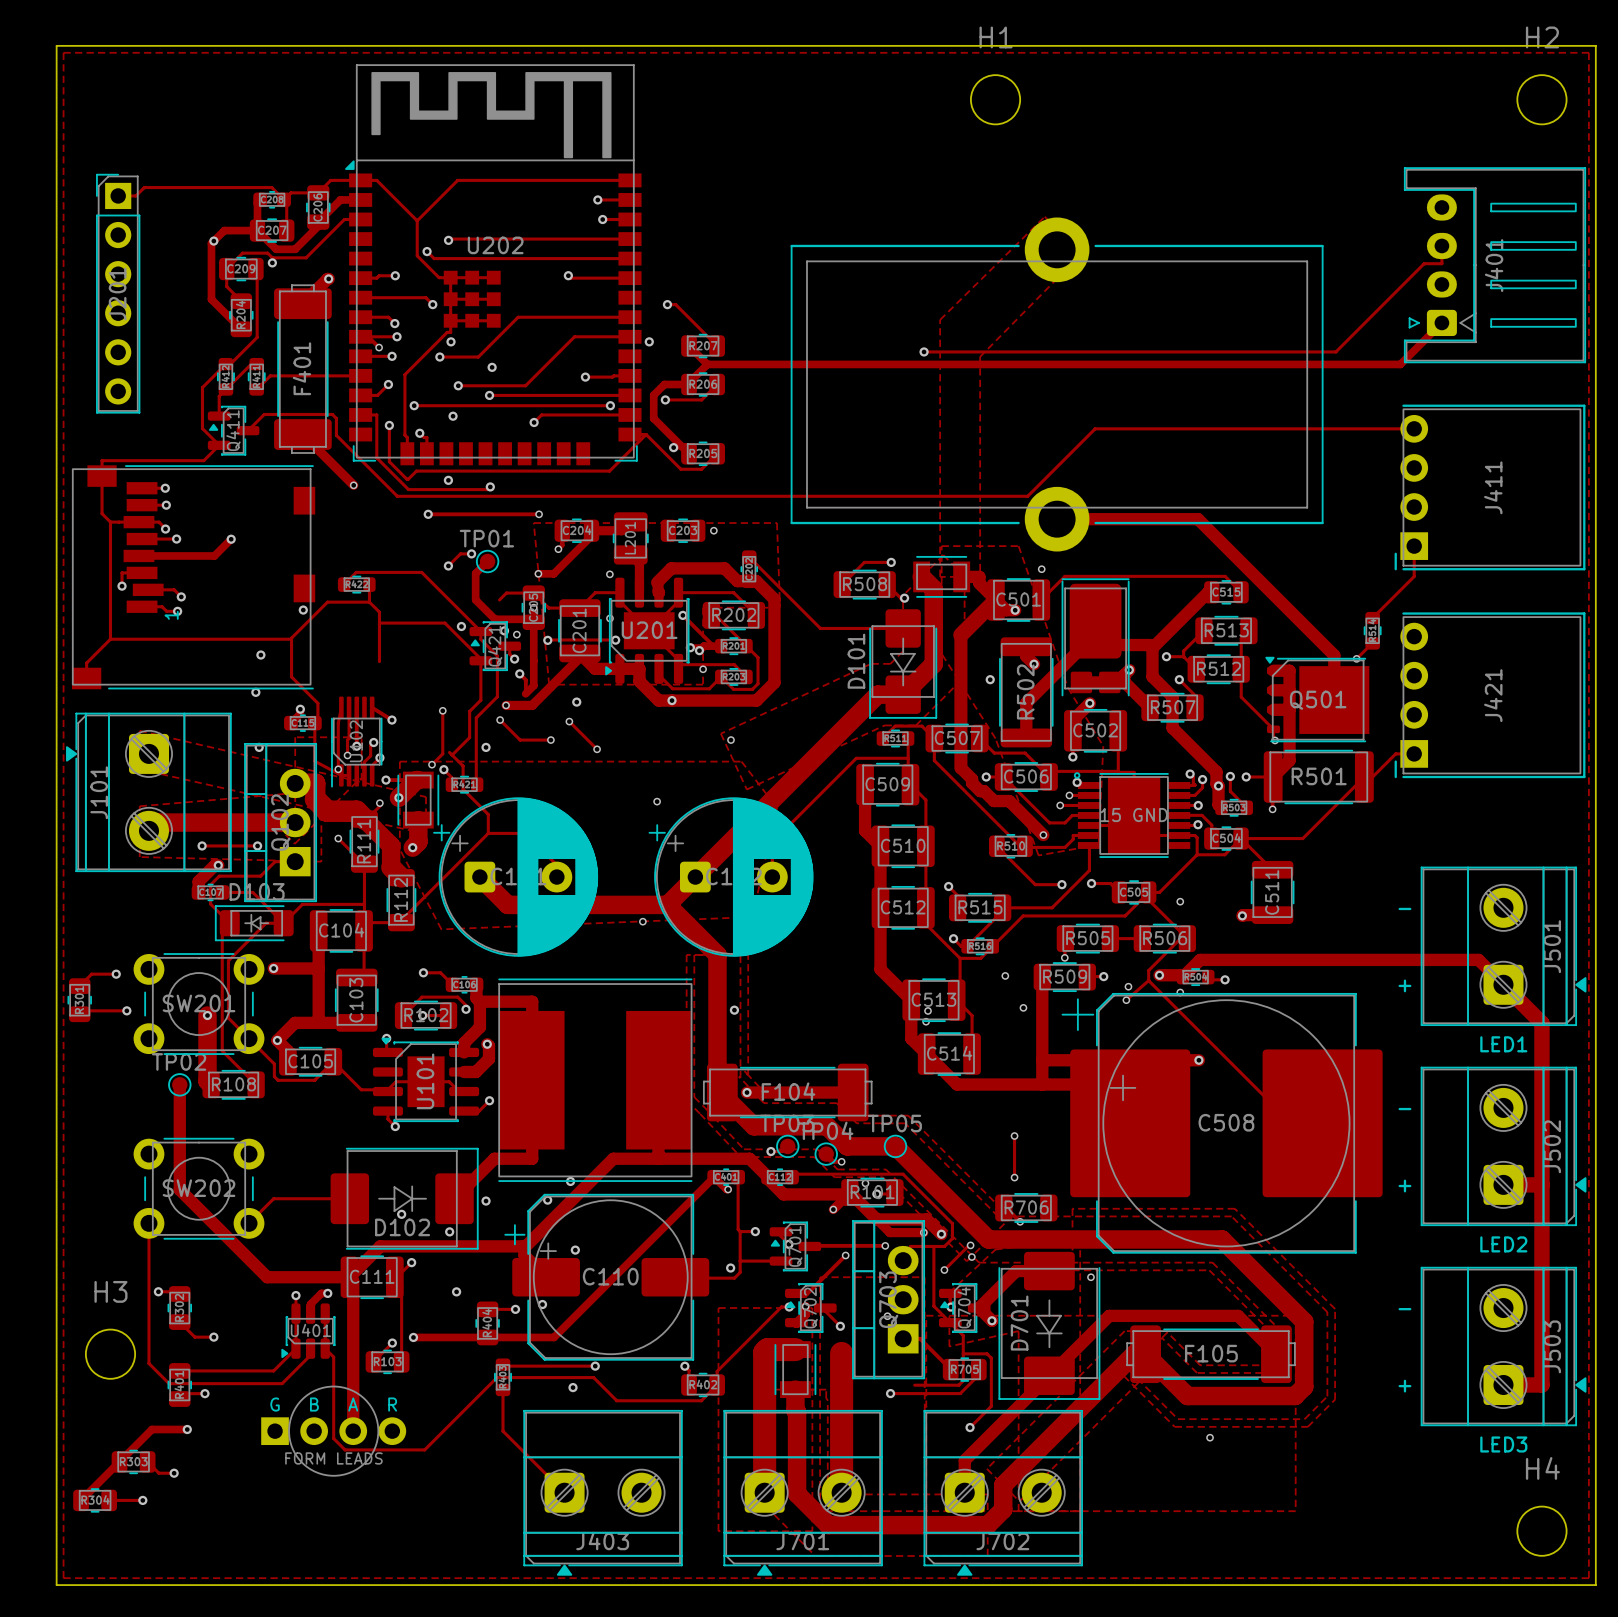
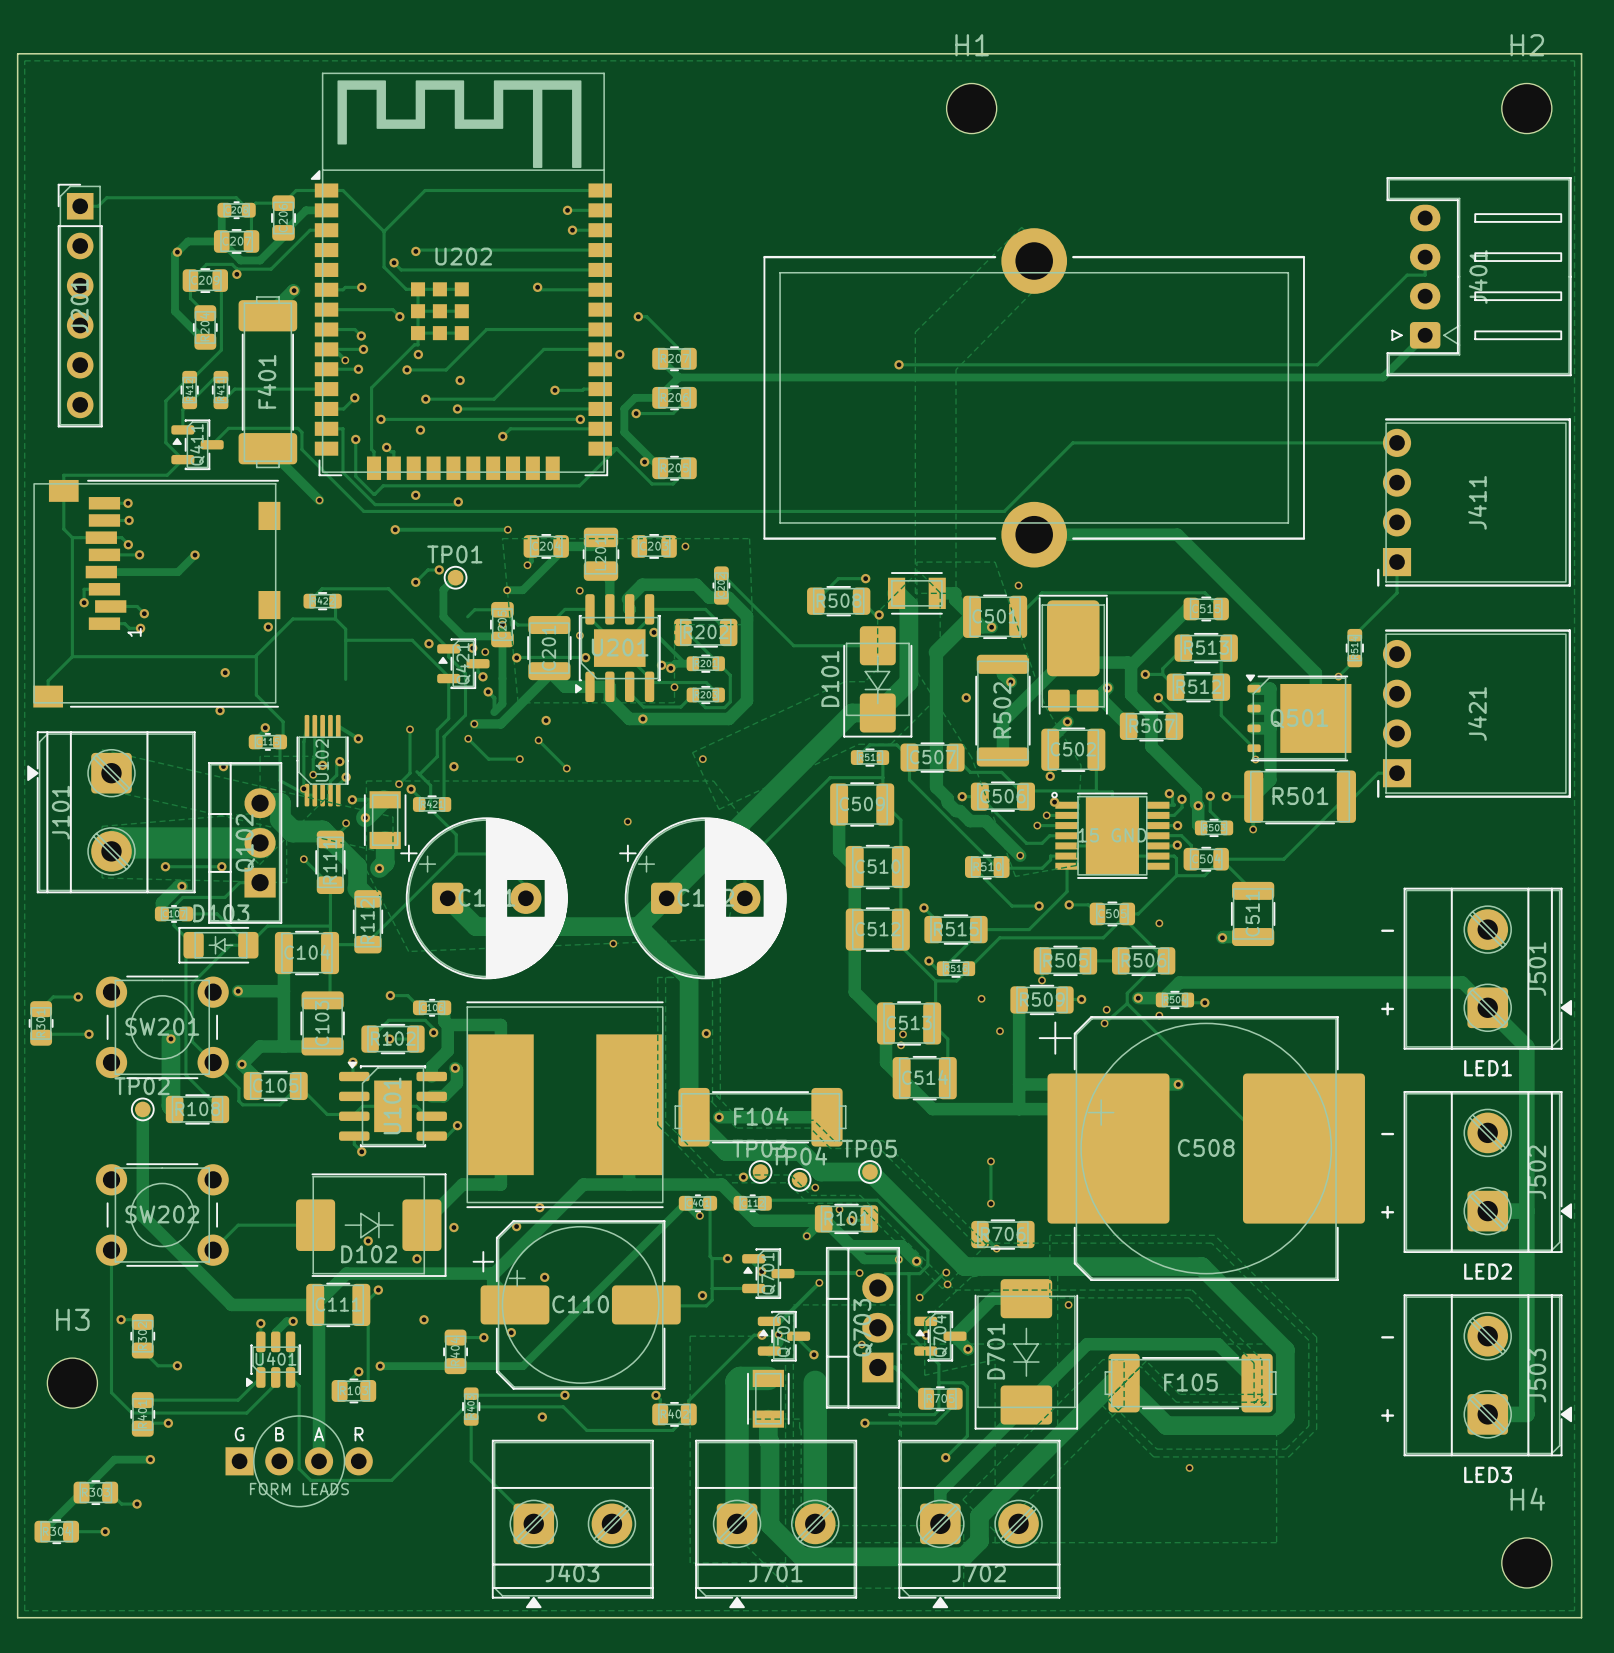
track width: thin (295, 822) (157, 822) (148, 830) -> thick (260, 842) (119, 842) (111, 851)

